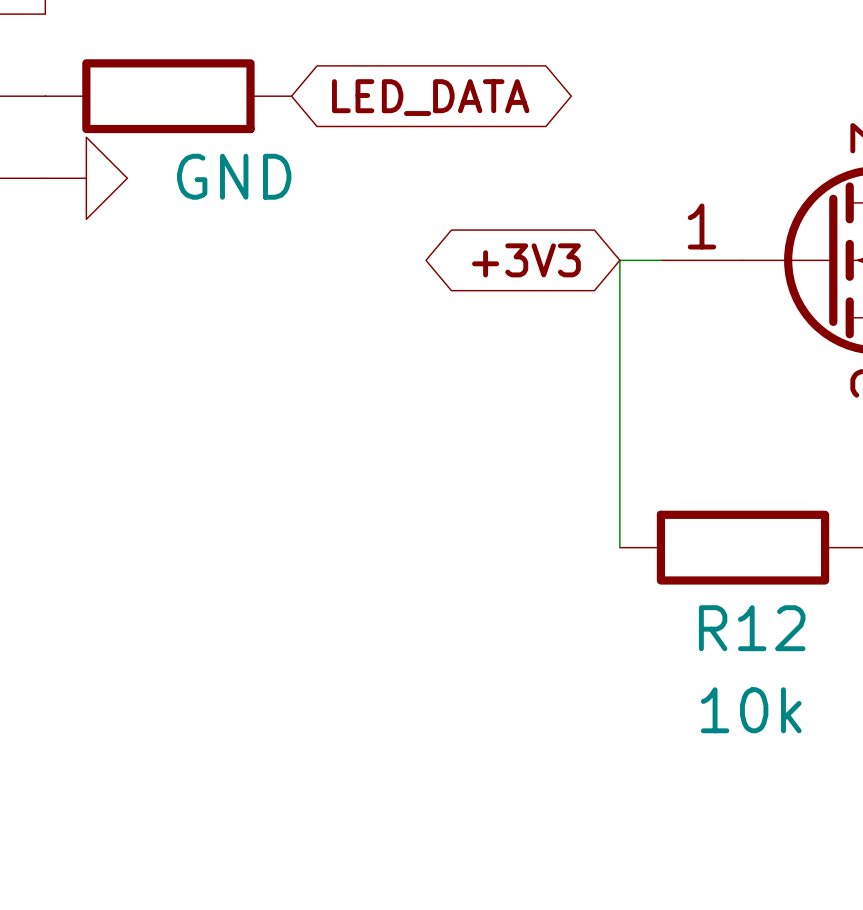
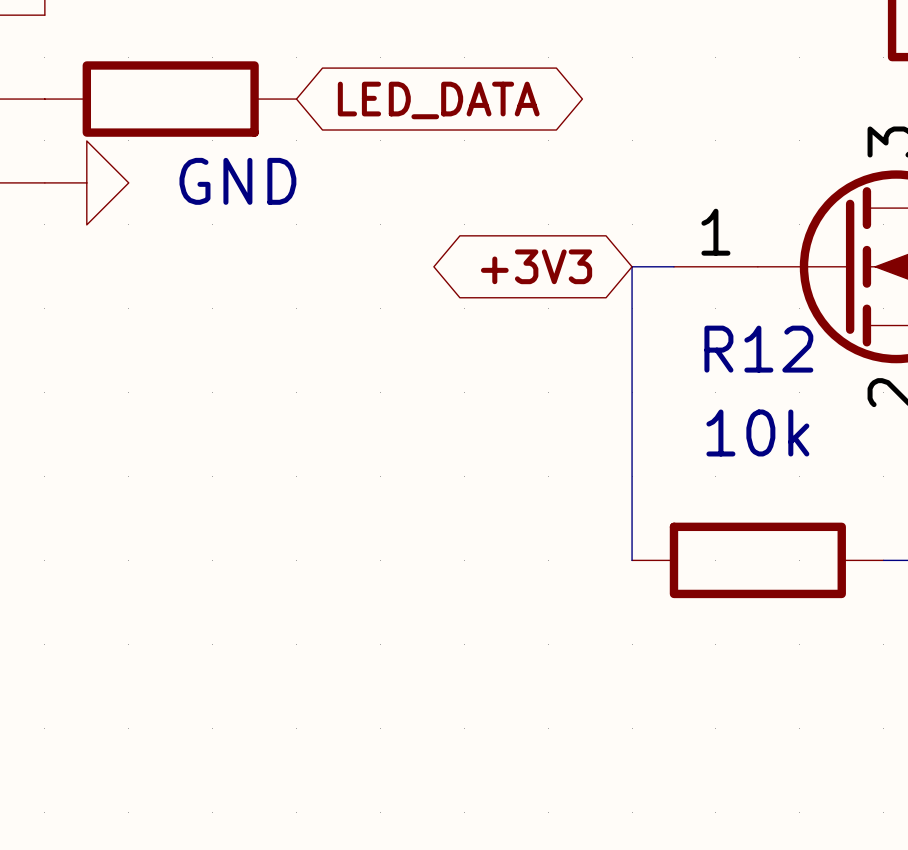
R12 name position: R12 (752, 628) -> R12 (758, 349)
R12 value position: 10k (751, 710) -> 10k (757, 433)

